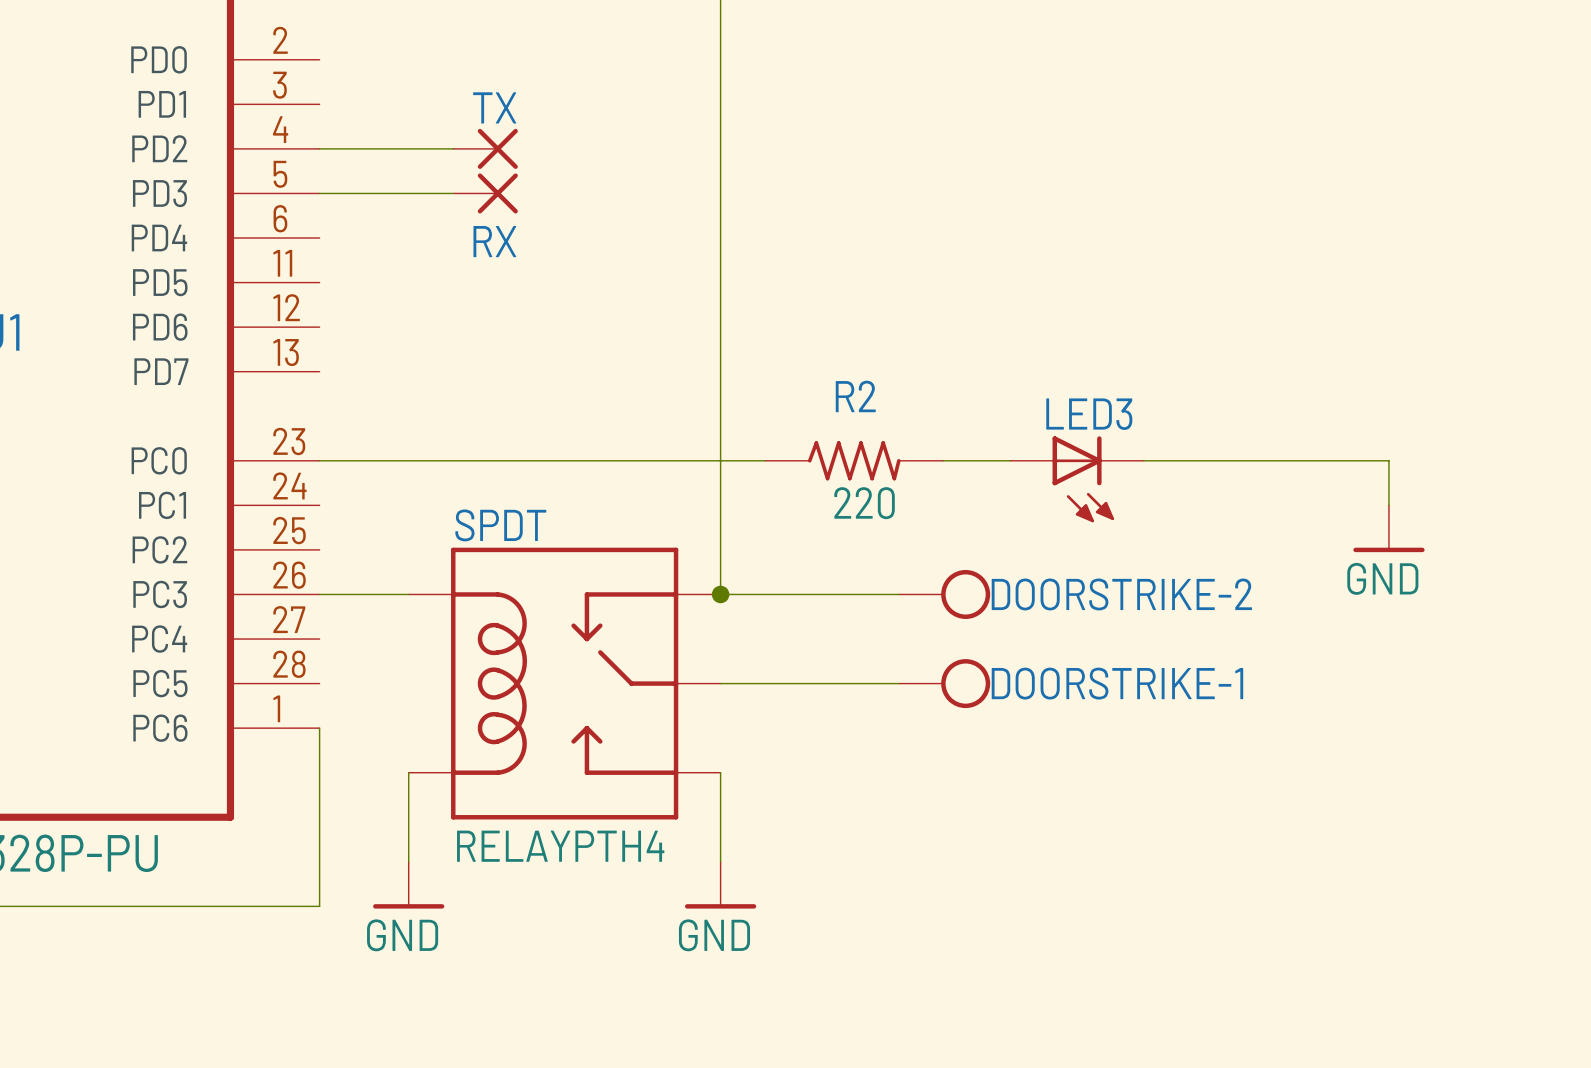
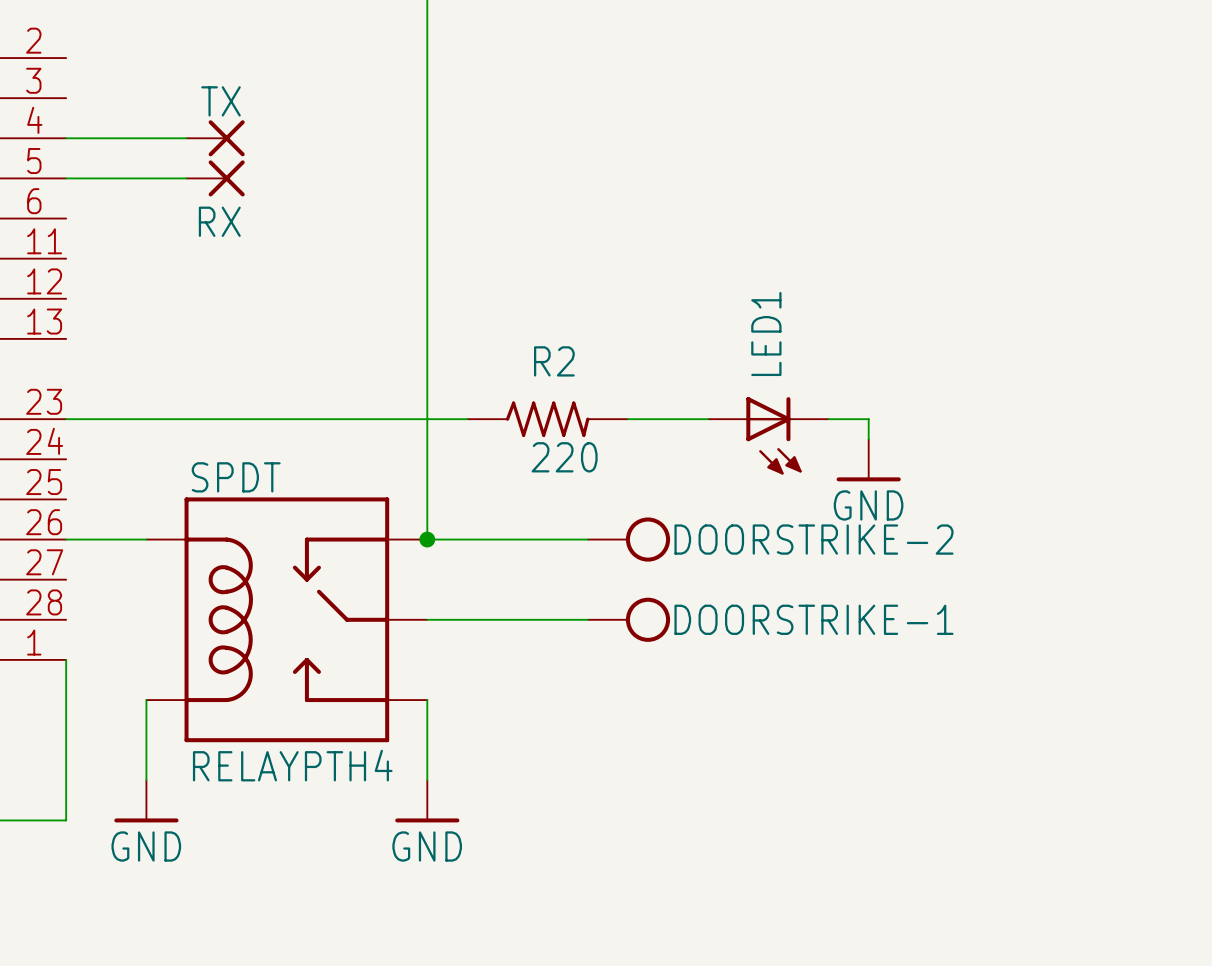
wire: (1210, 460) (1388, 460) (1388, 505) -> (868, 419) (868, 439)
LED3: (1077, 479) -> none
LED1: none -> (768, 435)
power symbol position: GND (1388, 528) -> GND (868, 460)

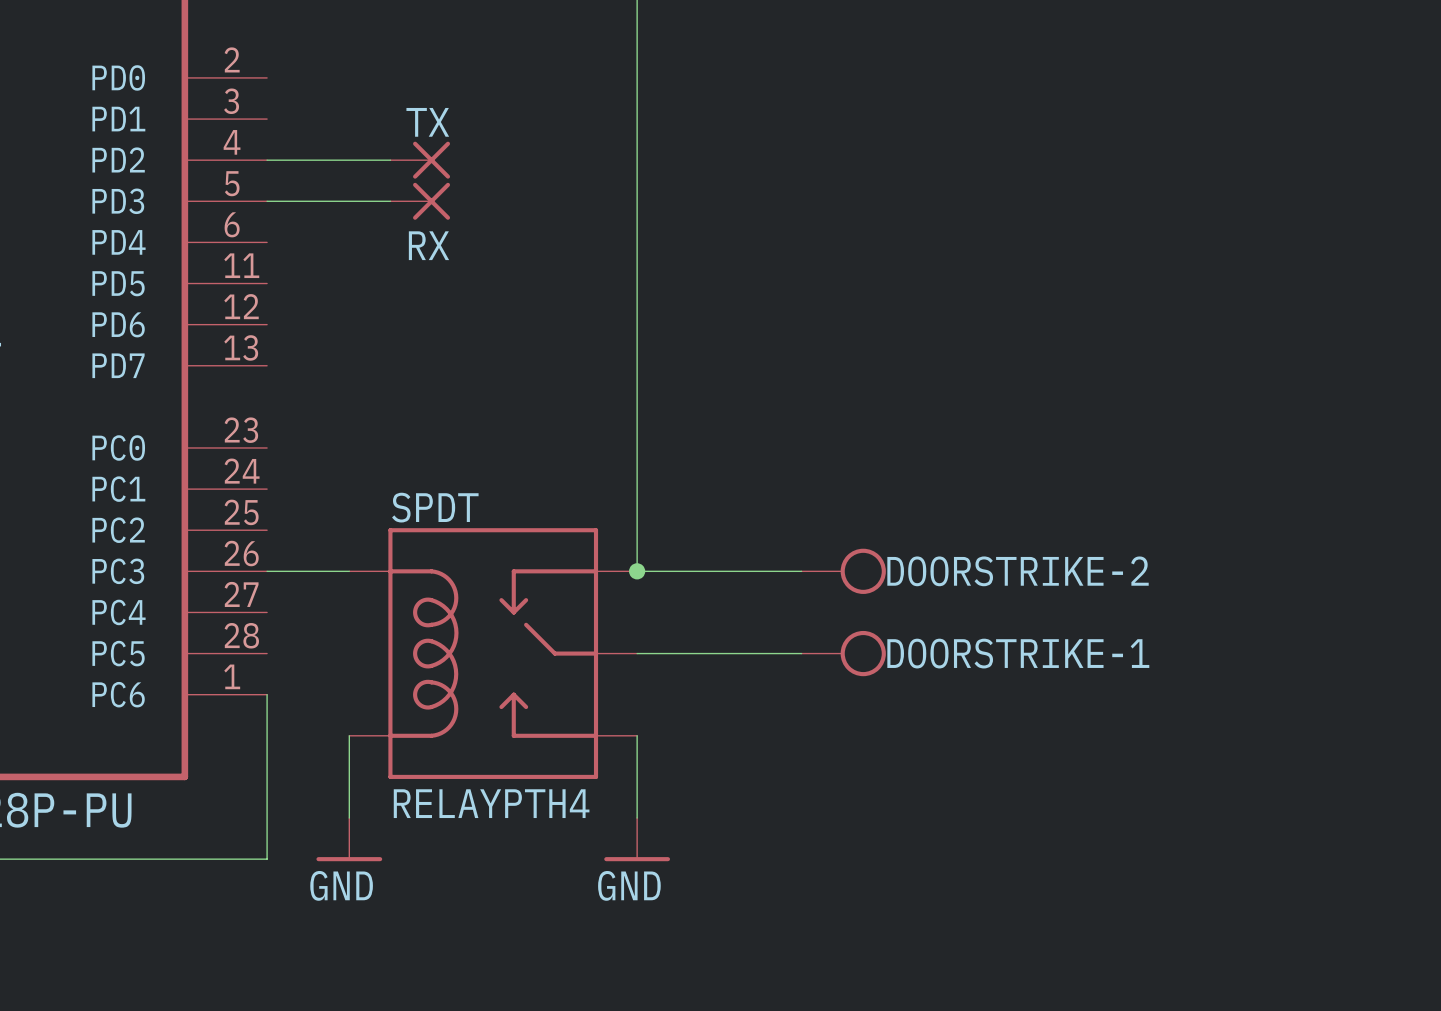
wire: (66, 419) (467, 419) -> none
R2: 220 (547, 419) -> none
wire: (627, 419) (708, 419) -> none
wire: (828, 419) (868, 419) (868, 439) -> none
LED1: (768, 435) -> none
power symbol: GND (868, 460) -> none

